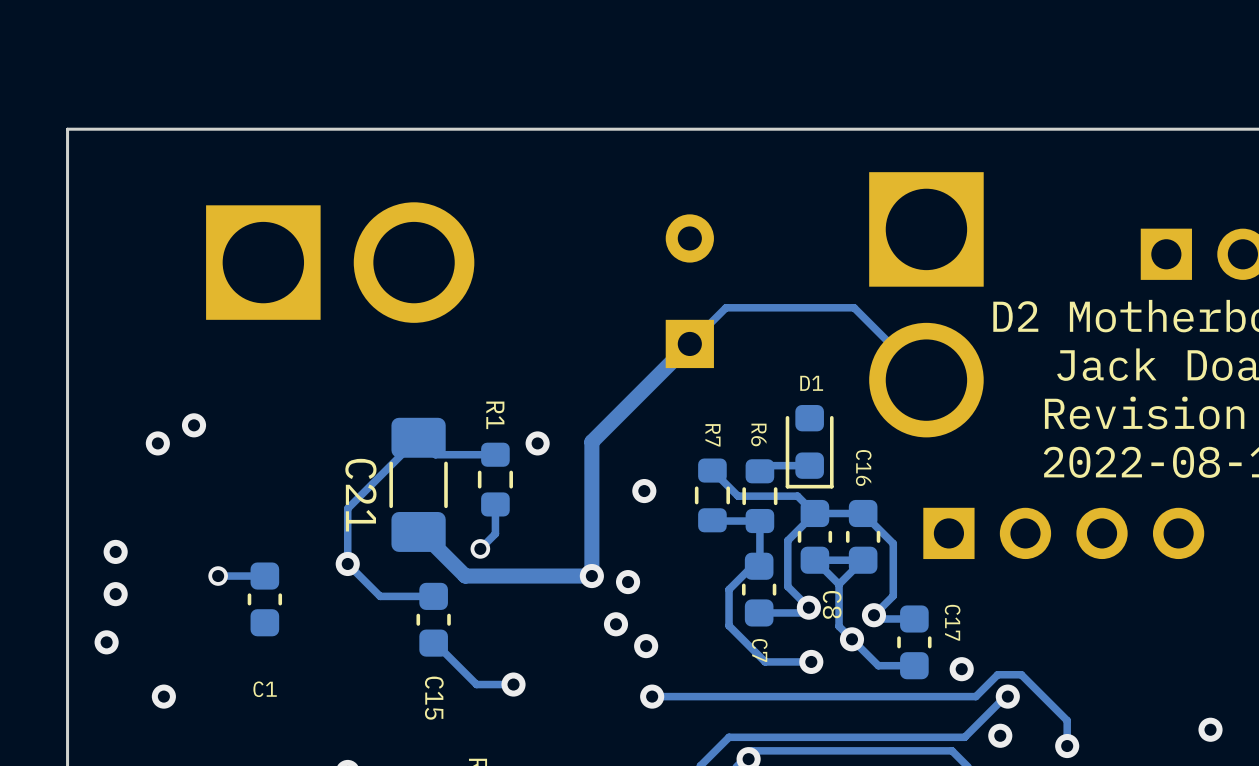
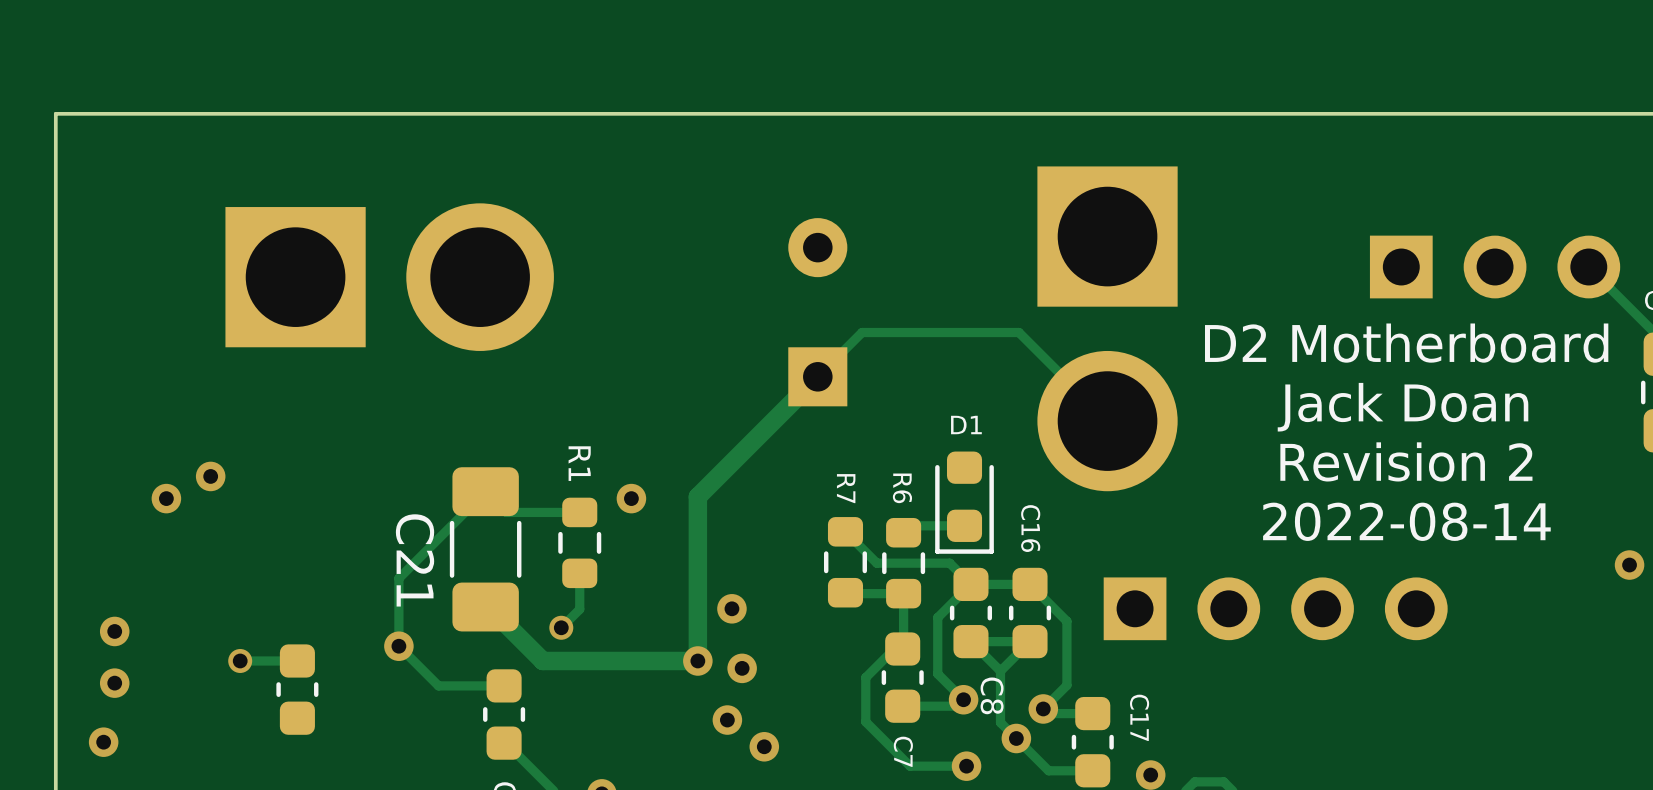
via position: (644, 491) -> (731, 608)

